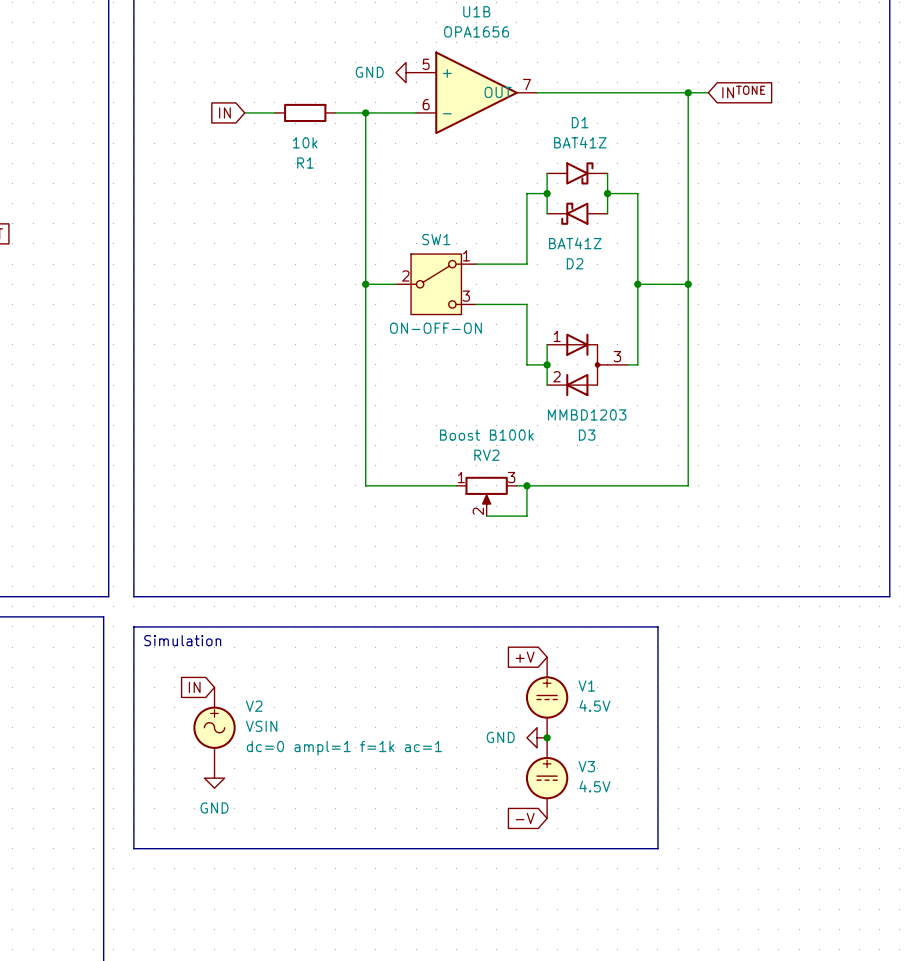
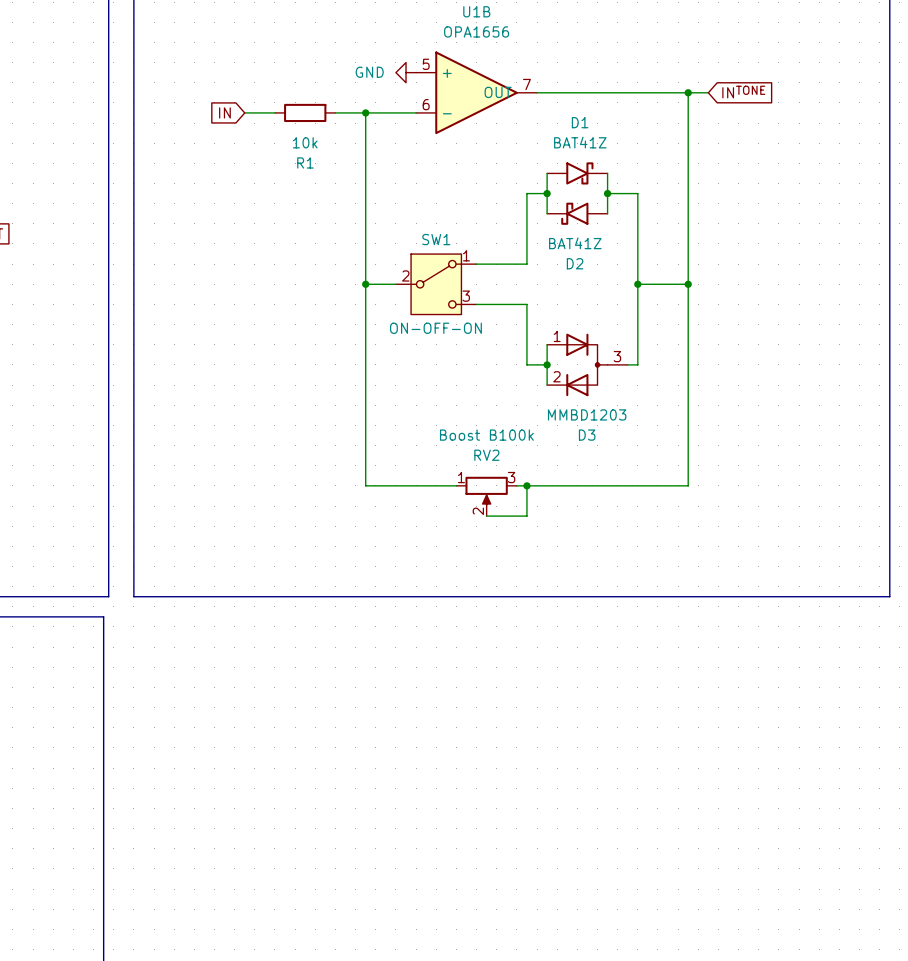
line: (133, 626) (657, 626) (657, 848) (133, 848) (133, 626) -> none
text: Simulation (182, 640) -> none
global label: +V (525, 657) -> none
global label: IN (194, 687) -> none
V1: 4.5V (547, 697) -> none
V2: VSIN (214, 727) -> none
power symbol: GND (537, 737) -> none
junction: (547, 737) -> none
power symbol: GND (214, 778) -> none
V3: 4.5V (547, 778) -> none
global label: -V (525, 818) -> none

